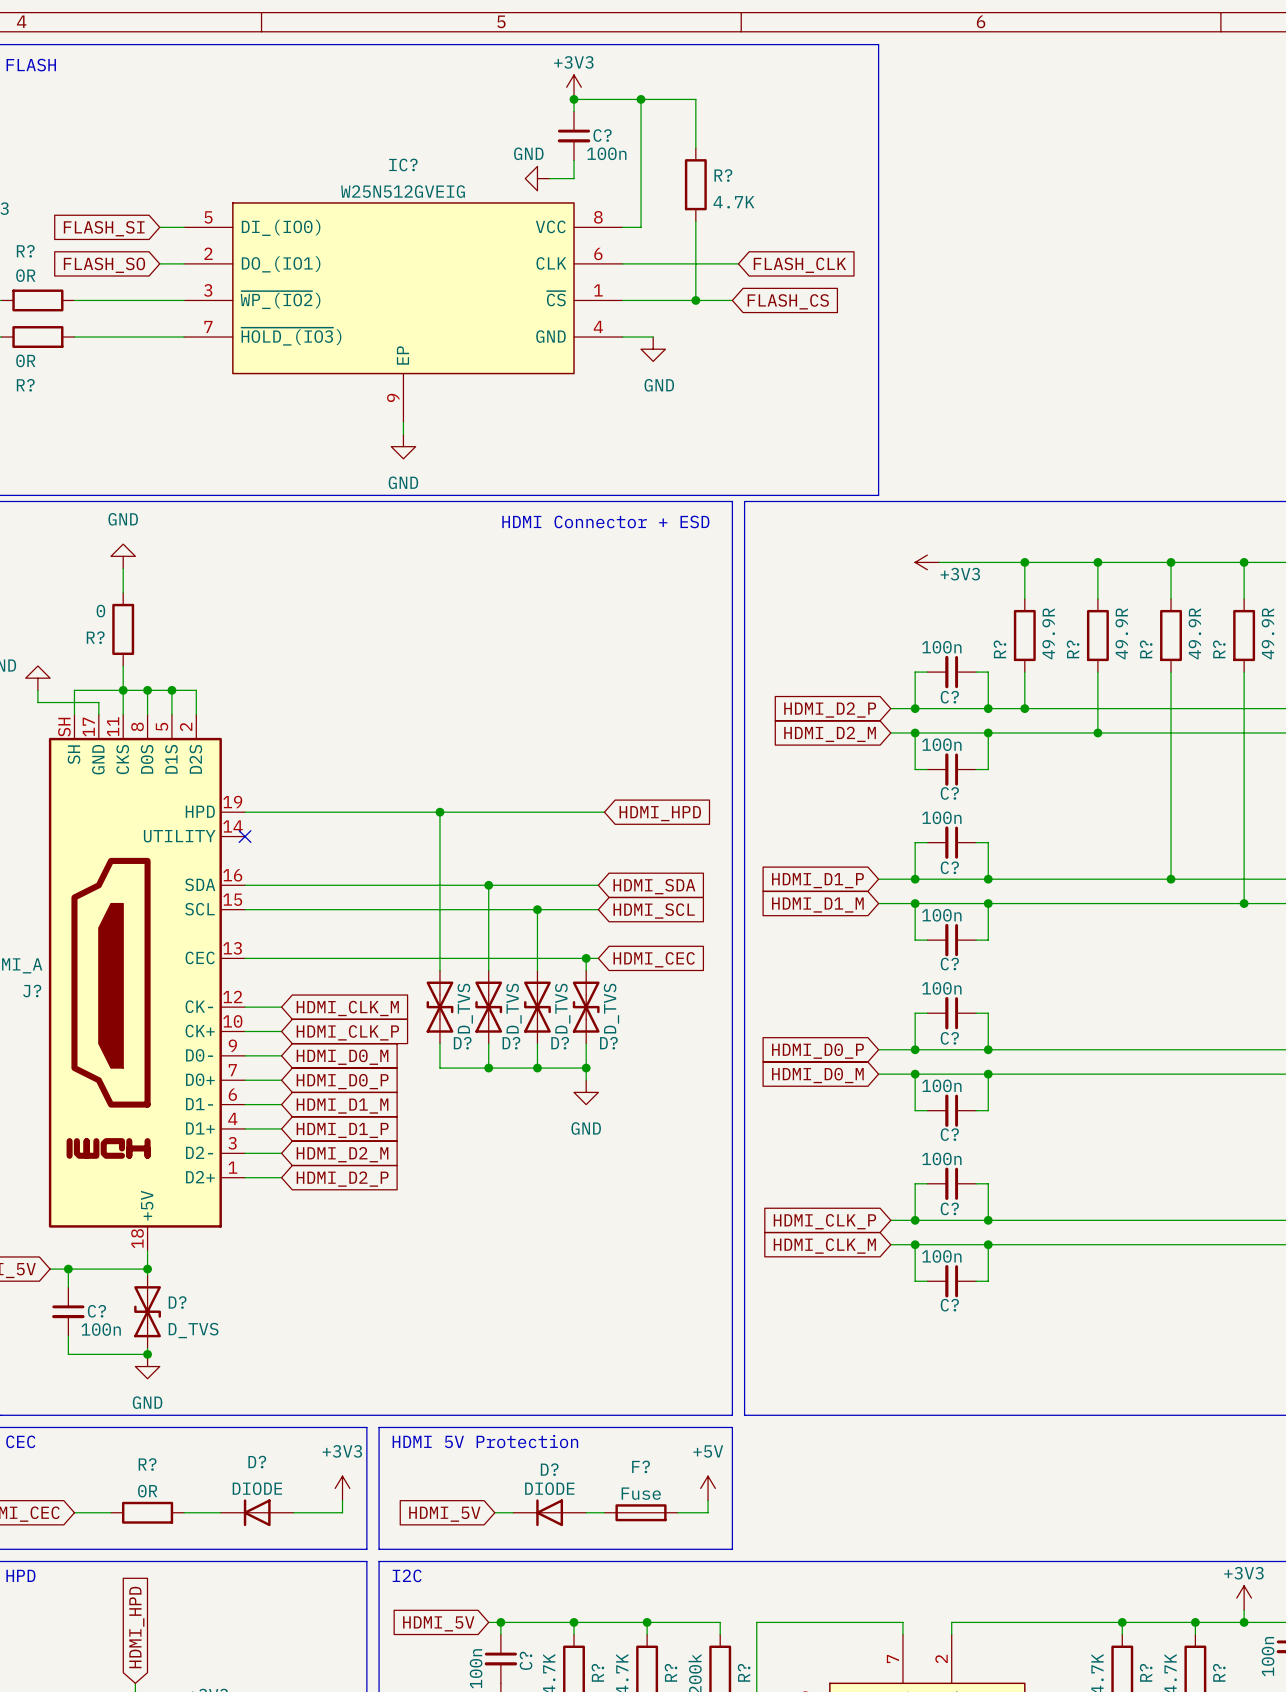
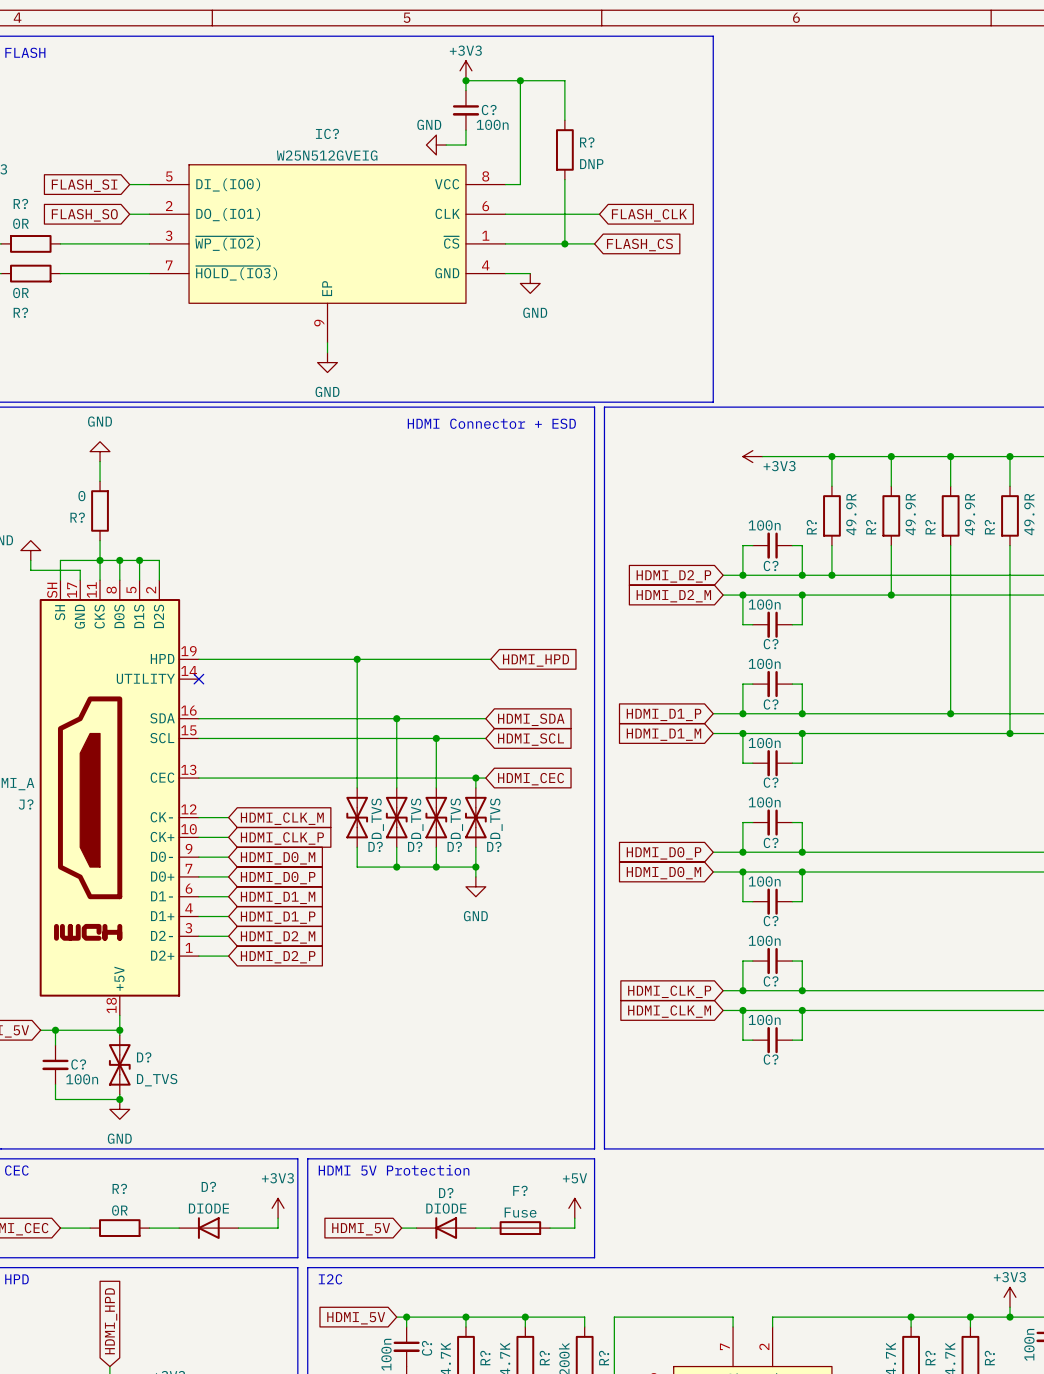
R? value: 4.7K (733, 202) -> DNP (591, 164)

